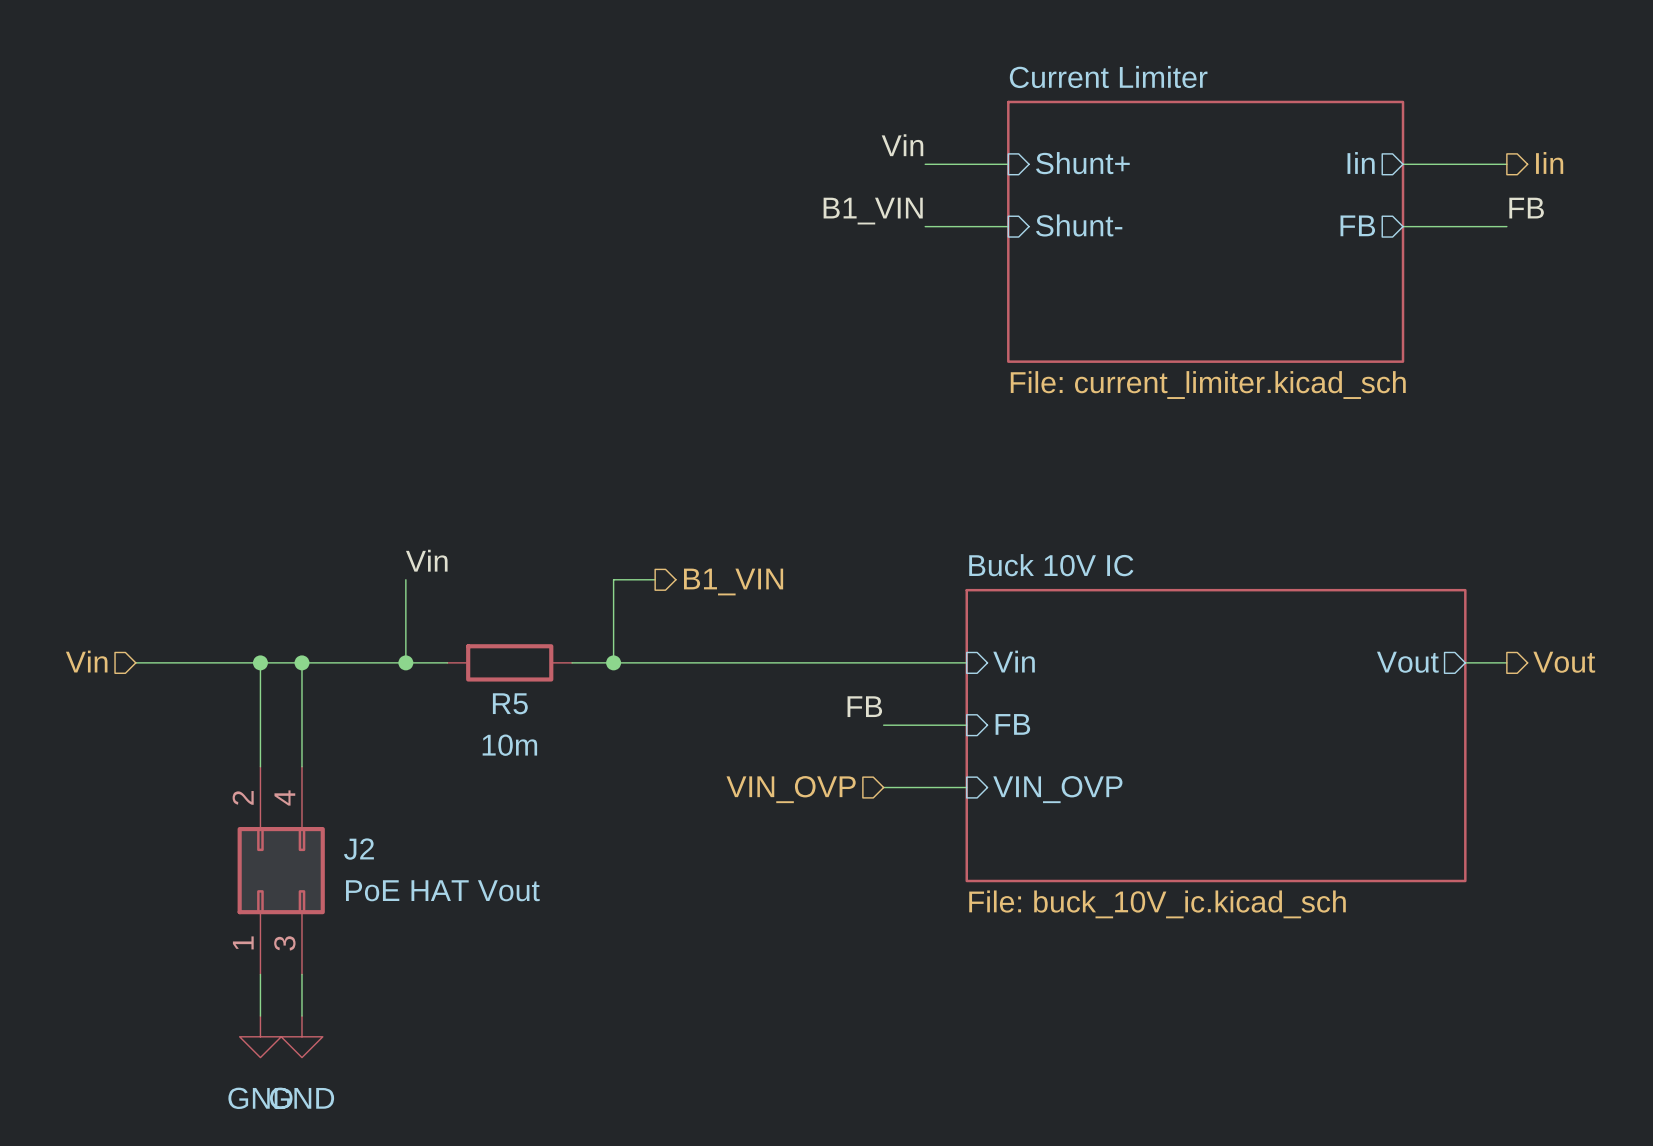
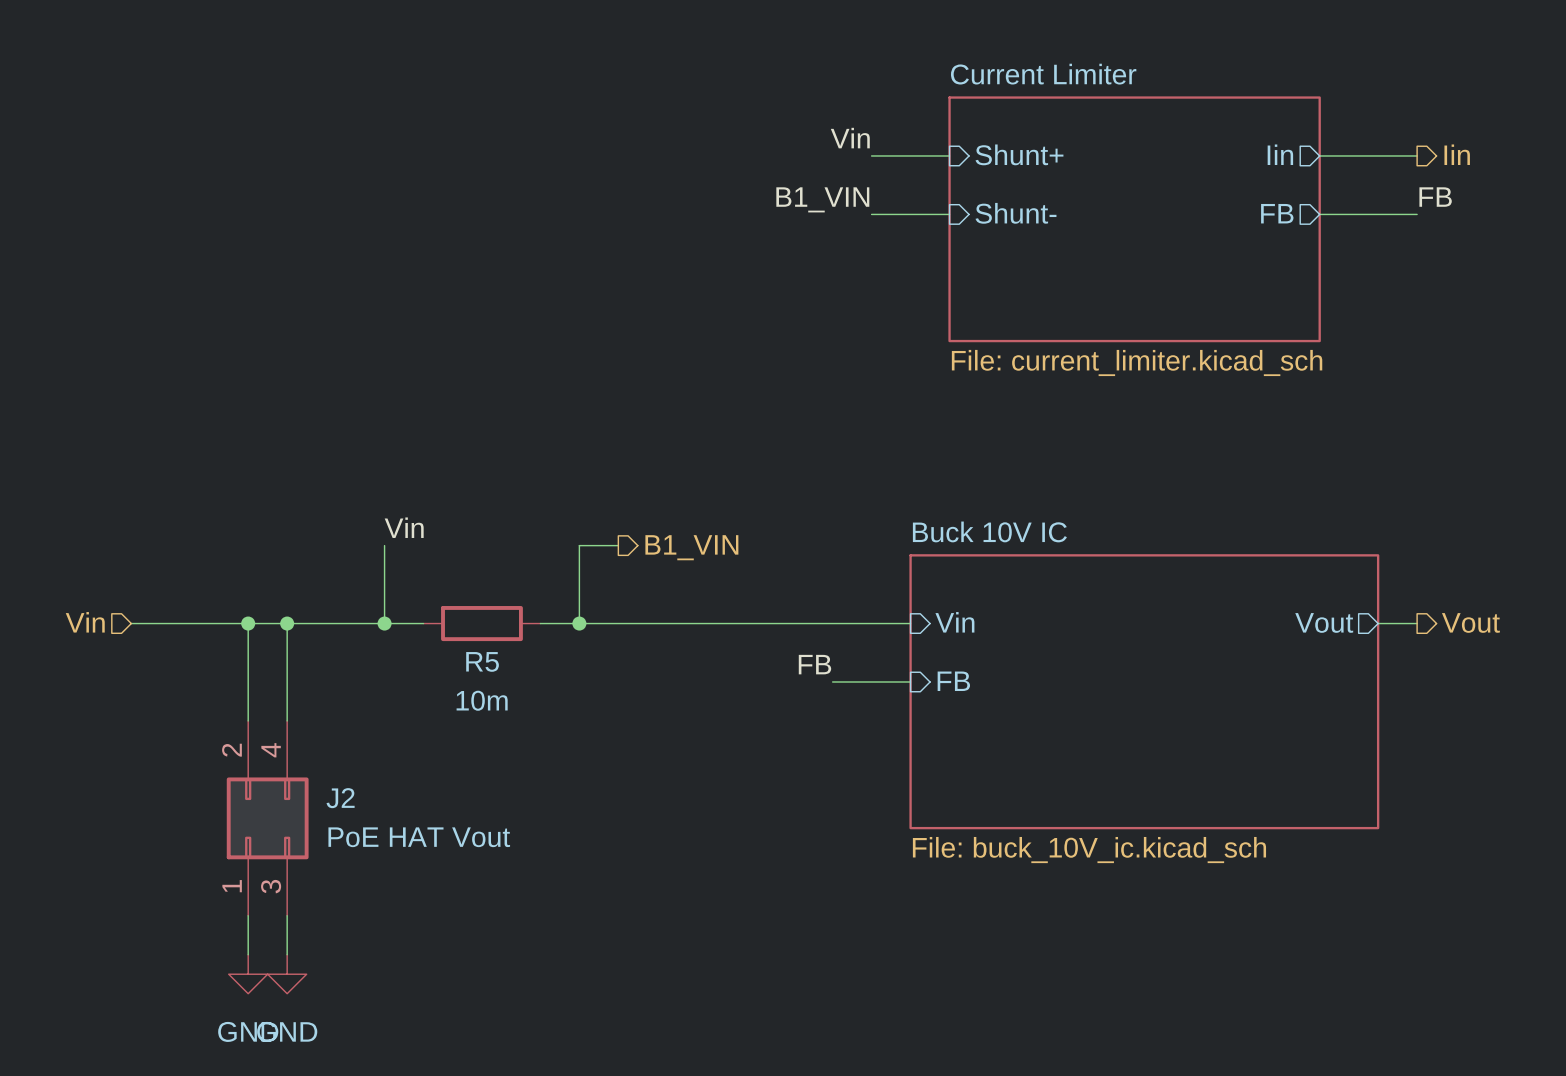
wire: (883, 787) (966, 787) -> none
hierarchical label: VIN_OVP (791, 789) -> none
sheet pin: VIN_OVP (1057, 789) -> none

